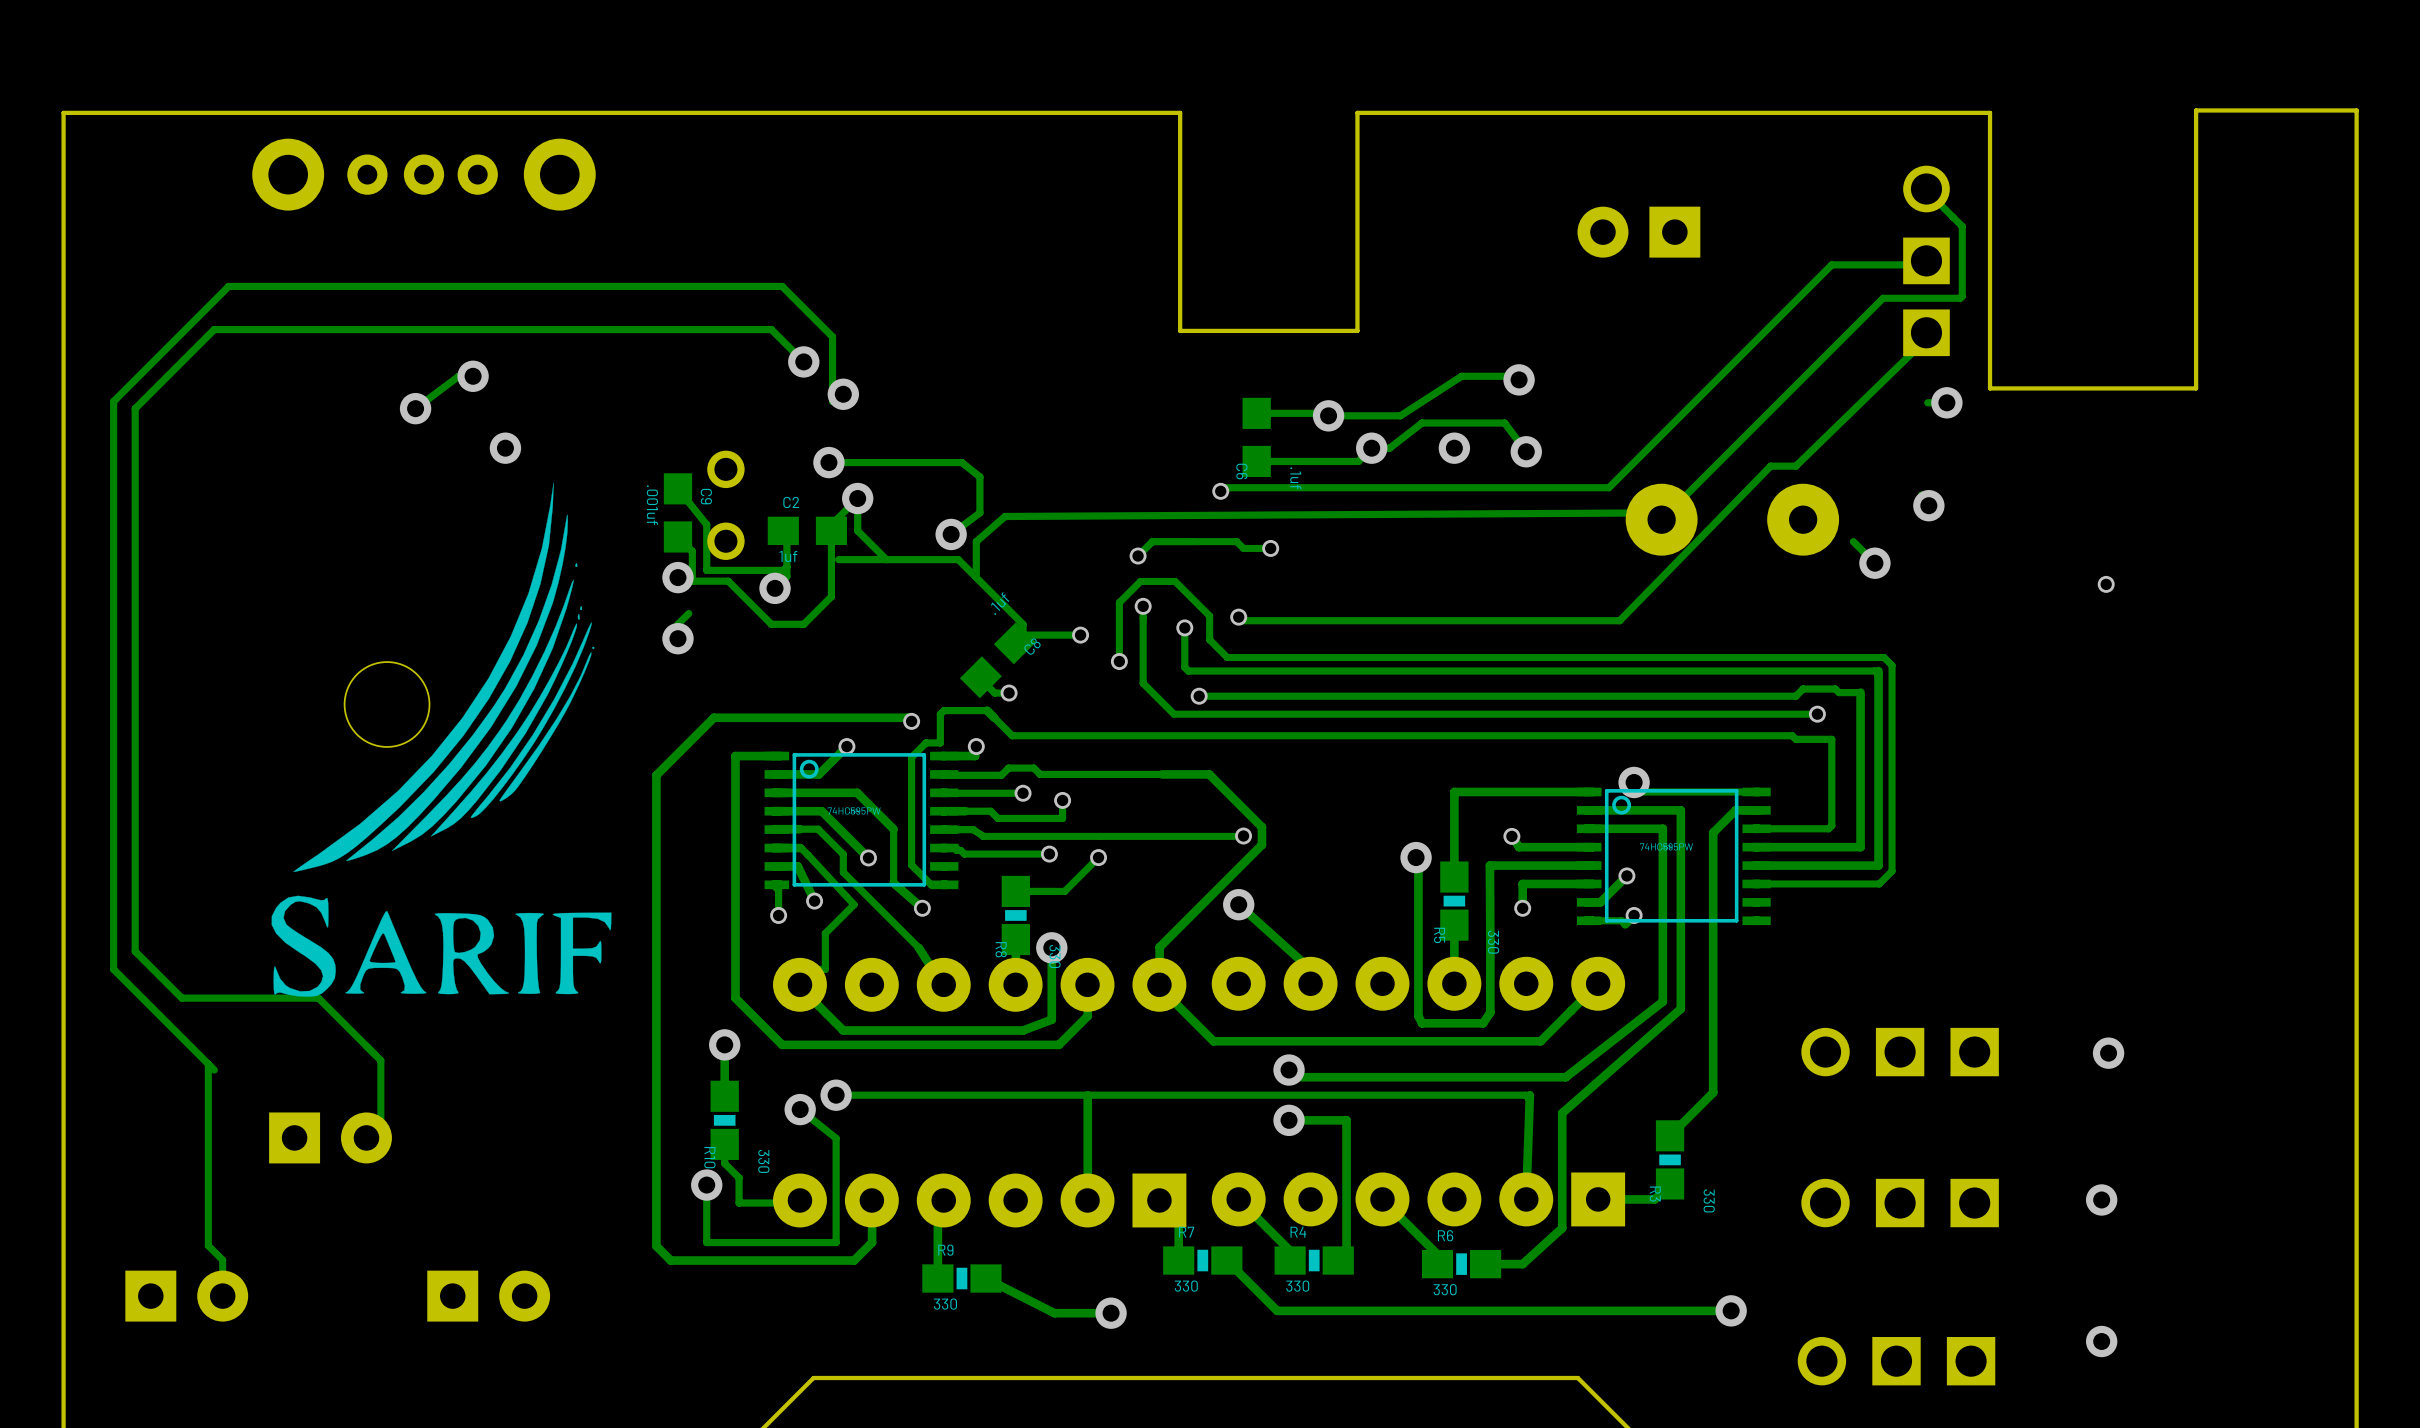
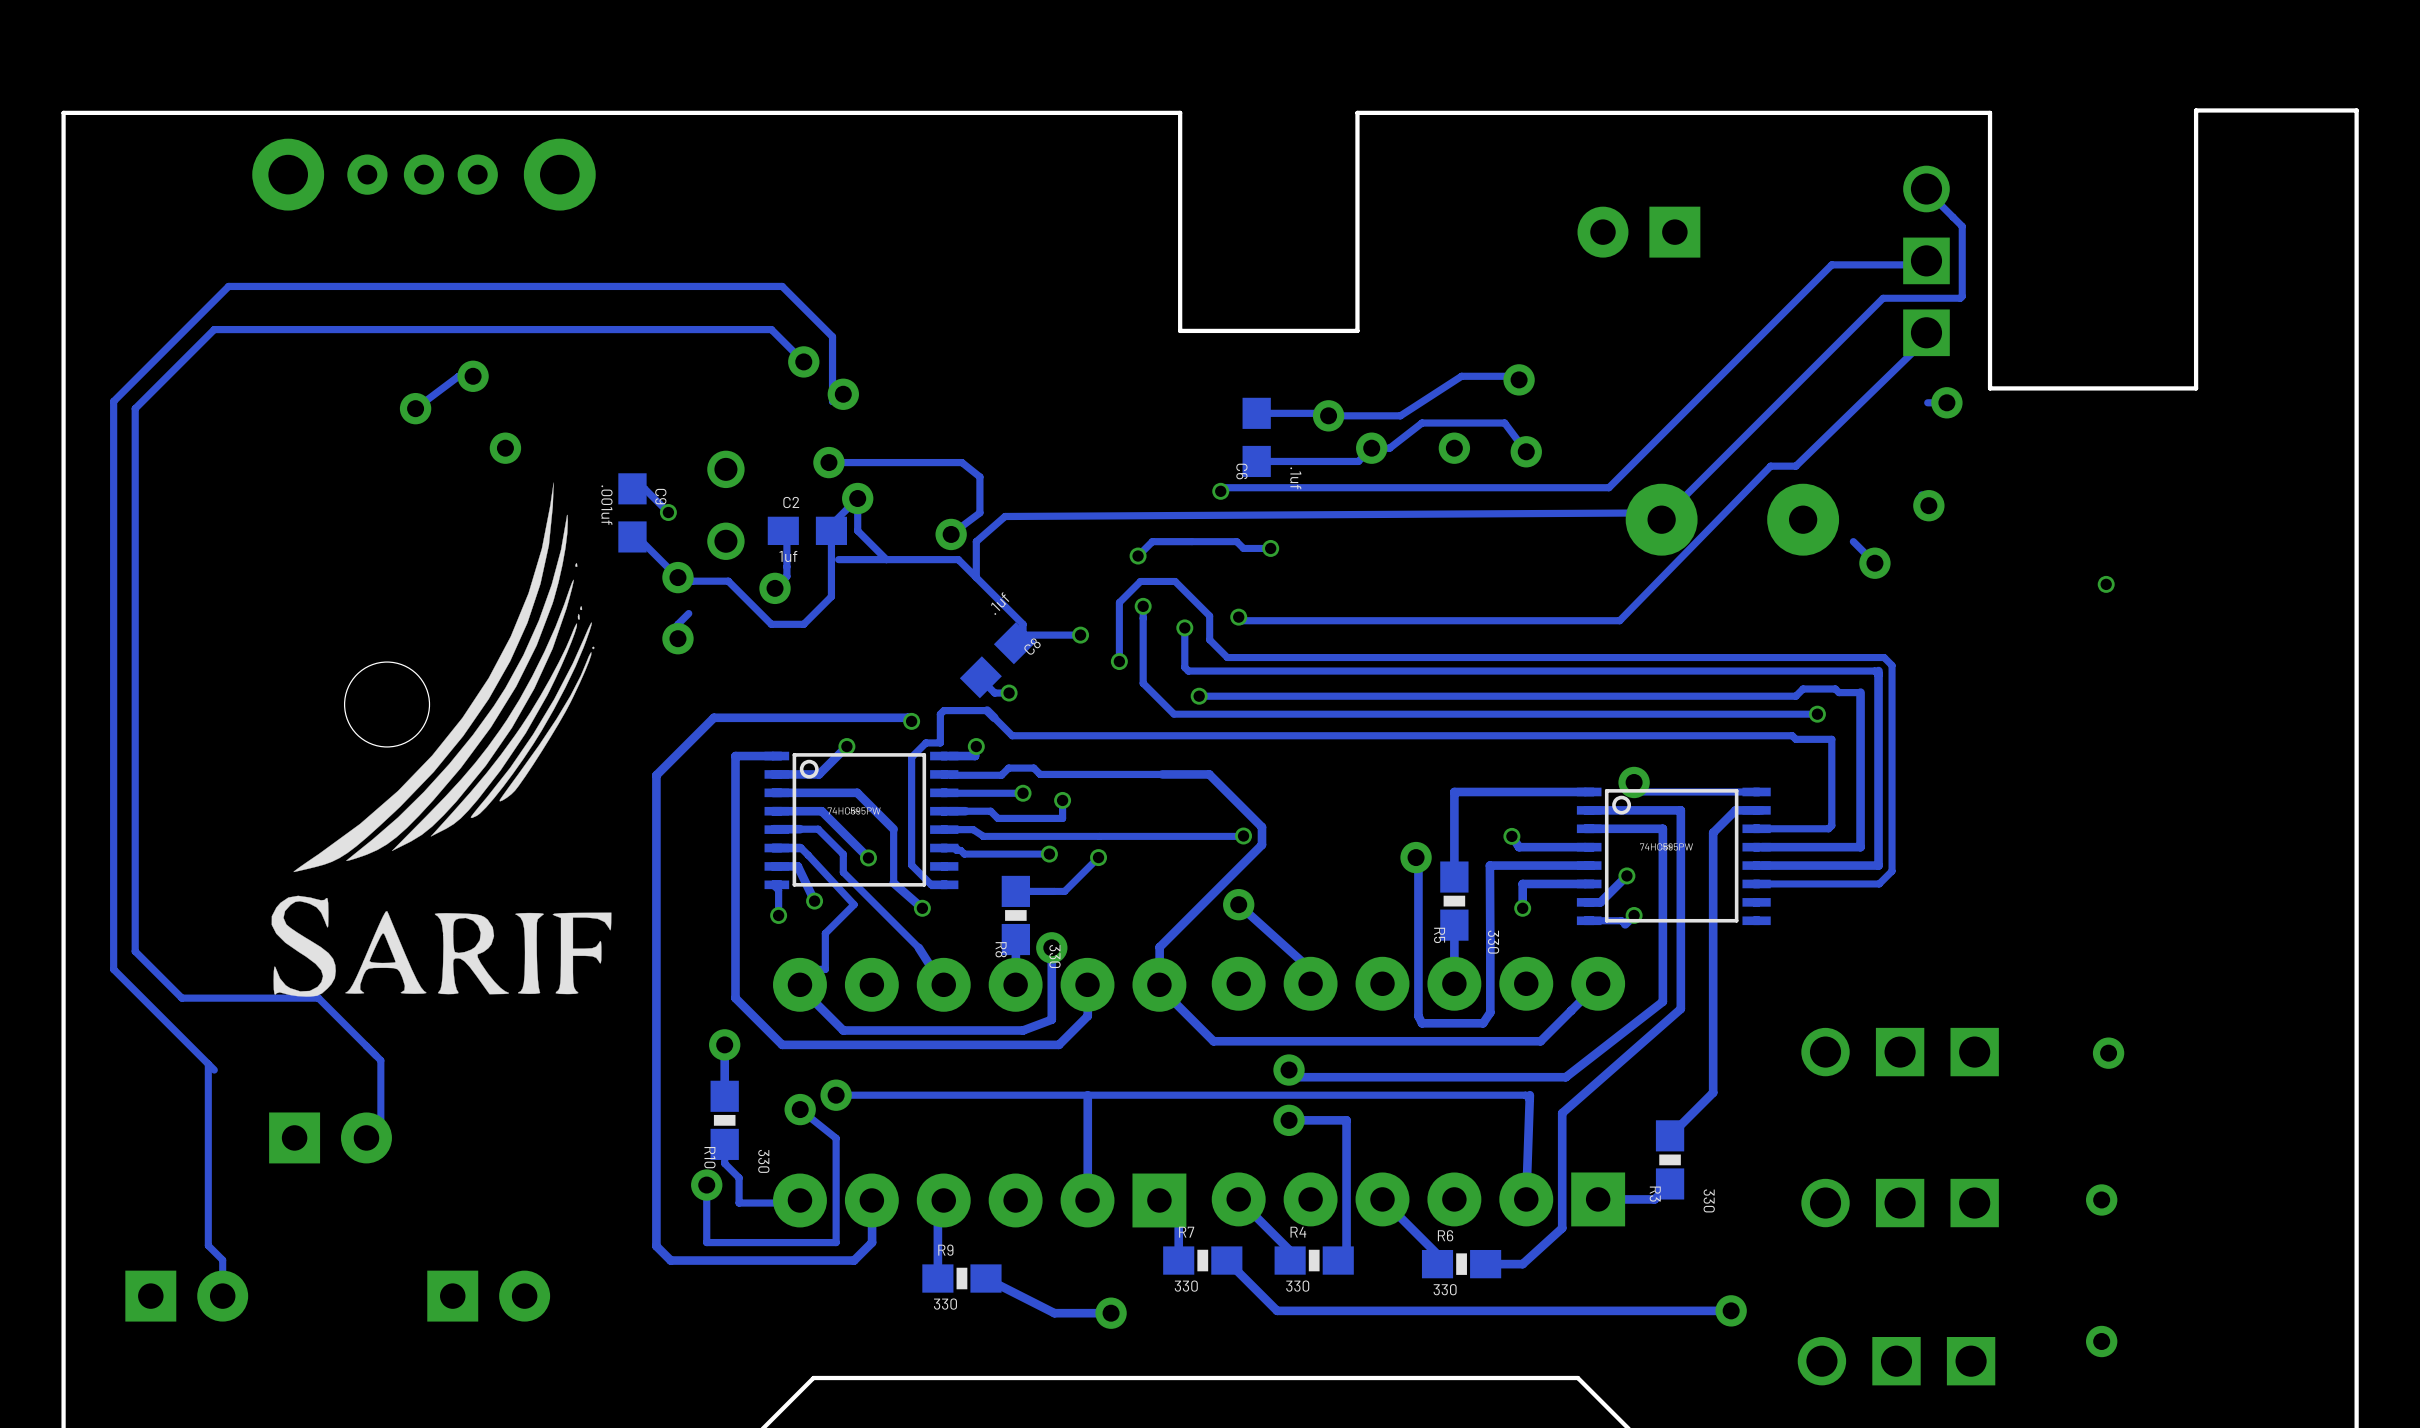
track: none -> (632, 488) (644, 488) (668, 512)
track: (677, 488) (706, 524) (706, 570) (783, 570) (786, 566) -> none
via: none -> (668, 512)
C9 position: (677, 512) -> (632, 512)
track: none -> (632, 536) (637, 536) (677, 577)
track: (677, 536) (692, 551) (692, 581) -> none

